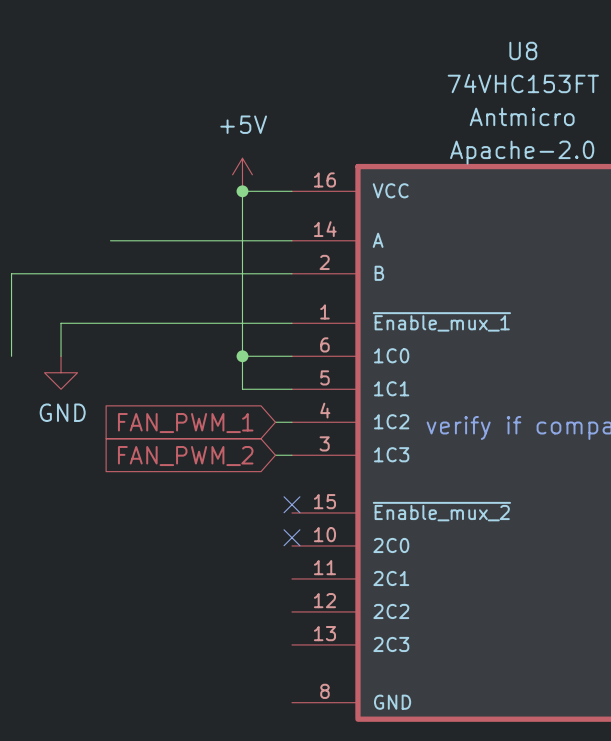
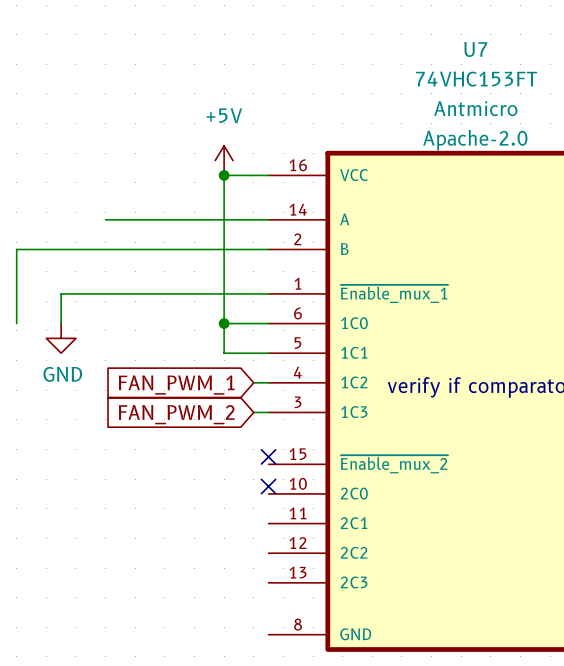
U8 name: U8 (523, 50) -> U7 (475, 49)

